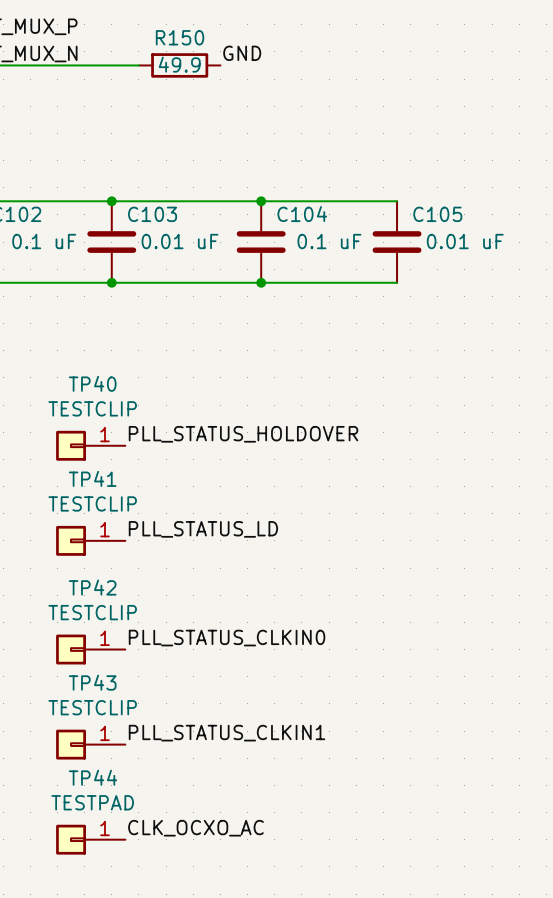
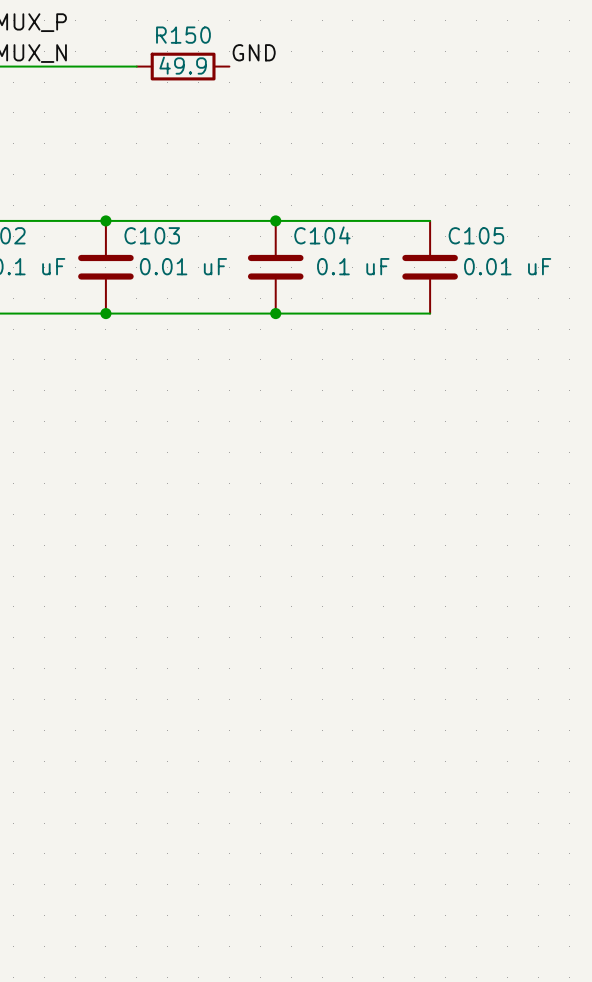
label: PLL_STATUS_HOLDOVER (243, 434) -> none
TP40: TESTCLIP (90, 445) -> none
label: PLL_STATUS_LD (203, 529) -> none
TP41: TESTCLIP (90, 540) -> none
label: PLL_STATUS_CLKIN0 (227, 638) -> none
TP42: TESTCLIP (90, 649) -> none
label: PLL_STATUS_CLKIN1 (227, 733) -> none
TP43: TESTCLIP (90, 744) -> none
label: CLK_OCXO_AC (195, 828) -> none
TP44: TESTPAD (90, 839) -> none

